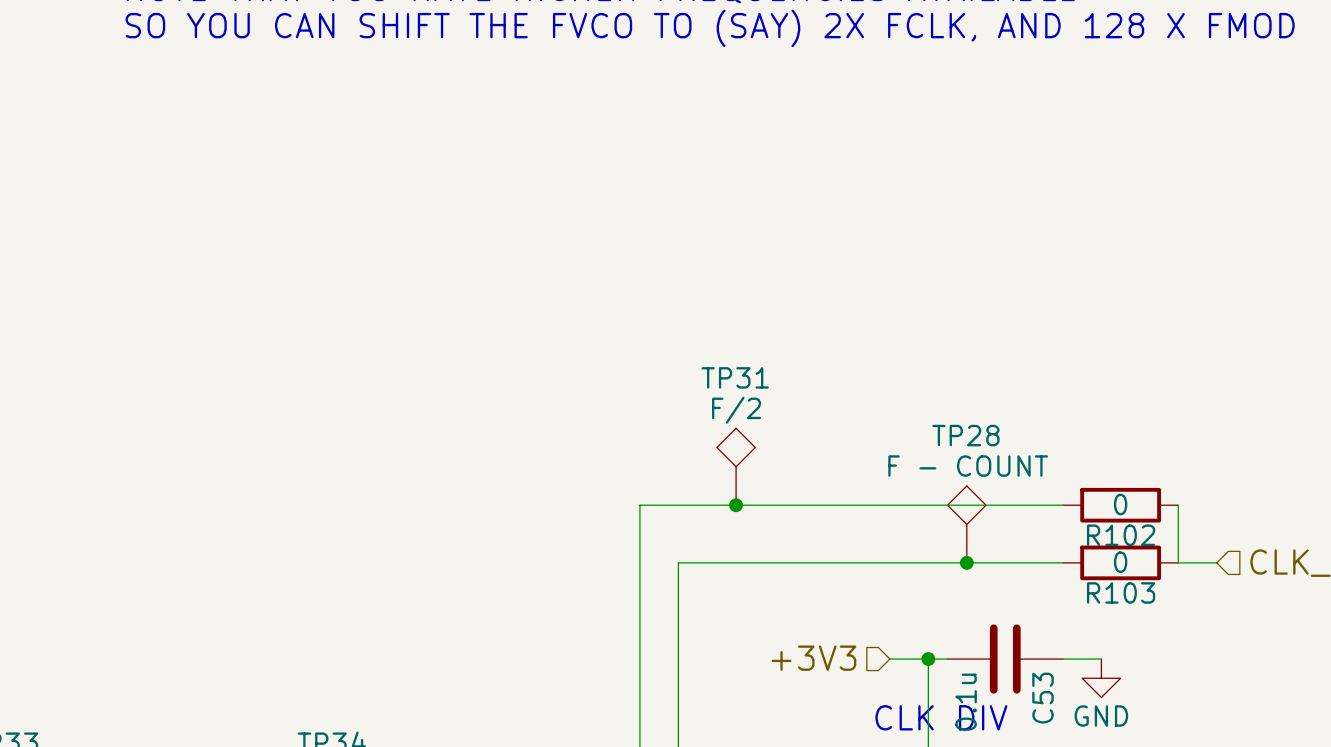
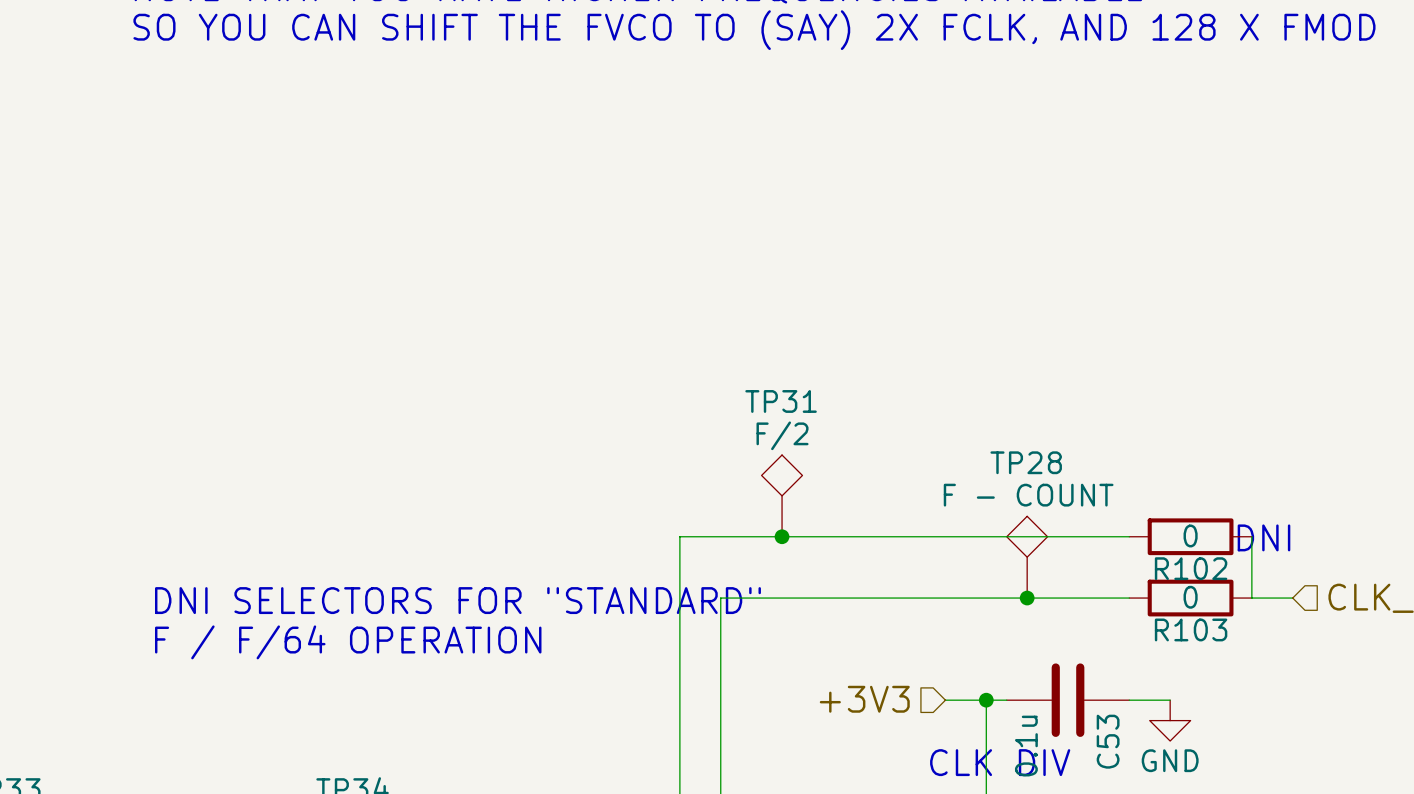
text: none -> DNI (1263, 537)
text: none -> DNI SELECTORS FOR "STANDARD" (457, 600)
text: none -> F / F/64 OPERATION (348, 642)

